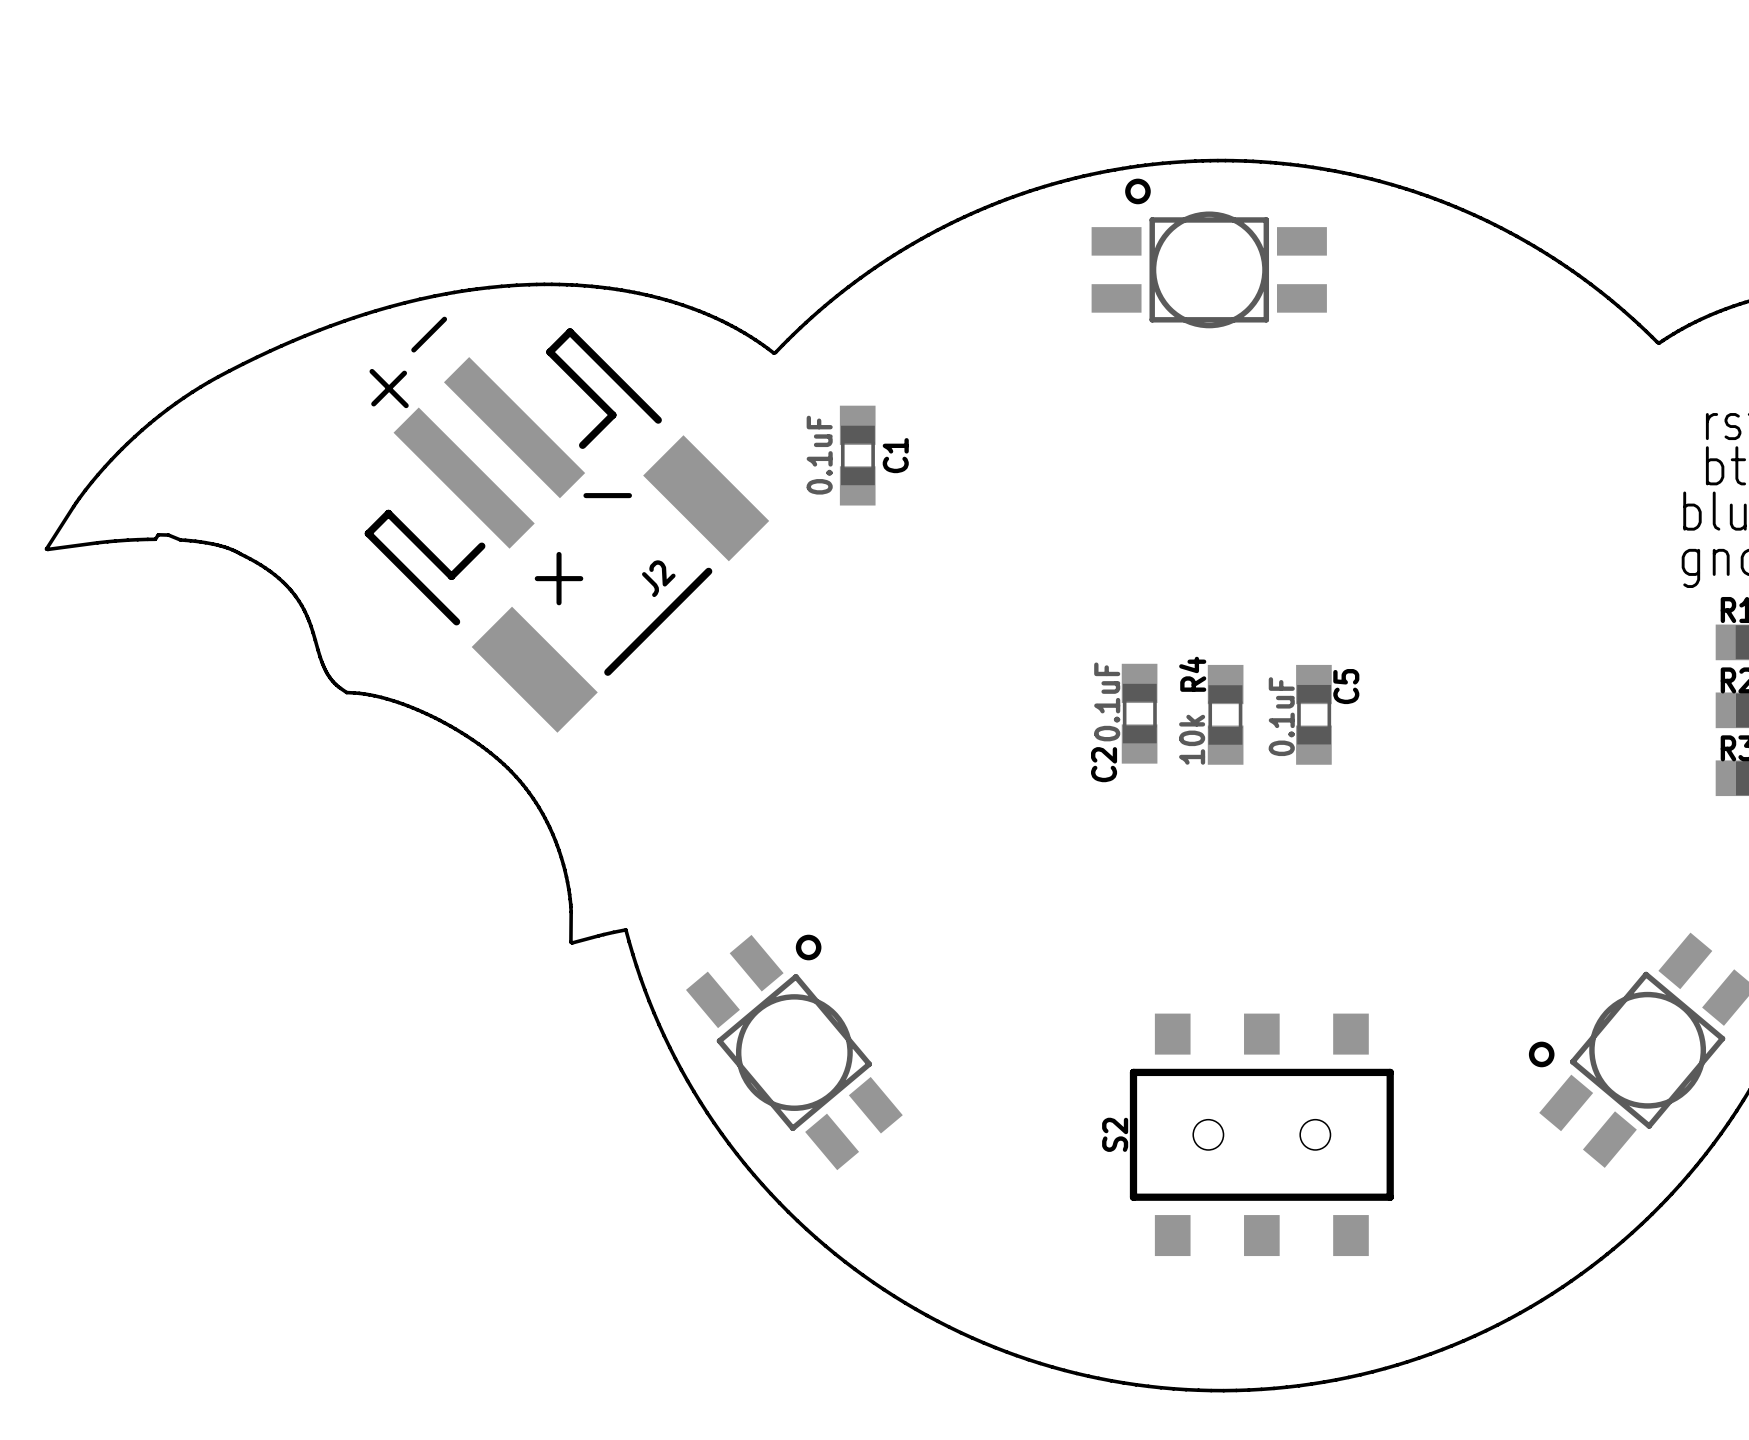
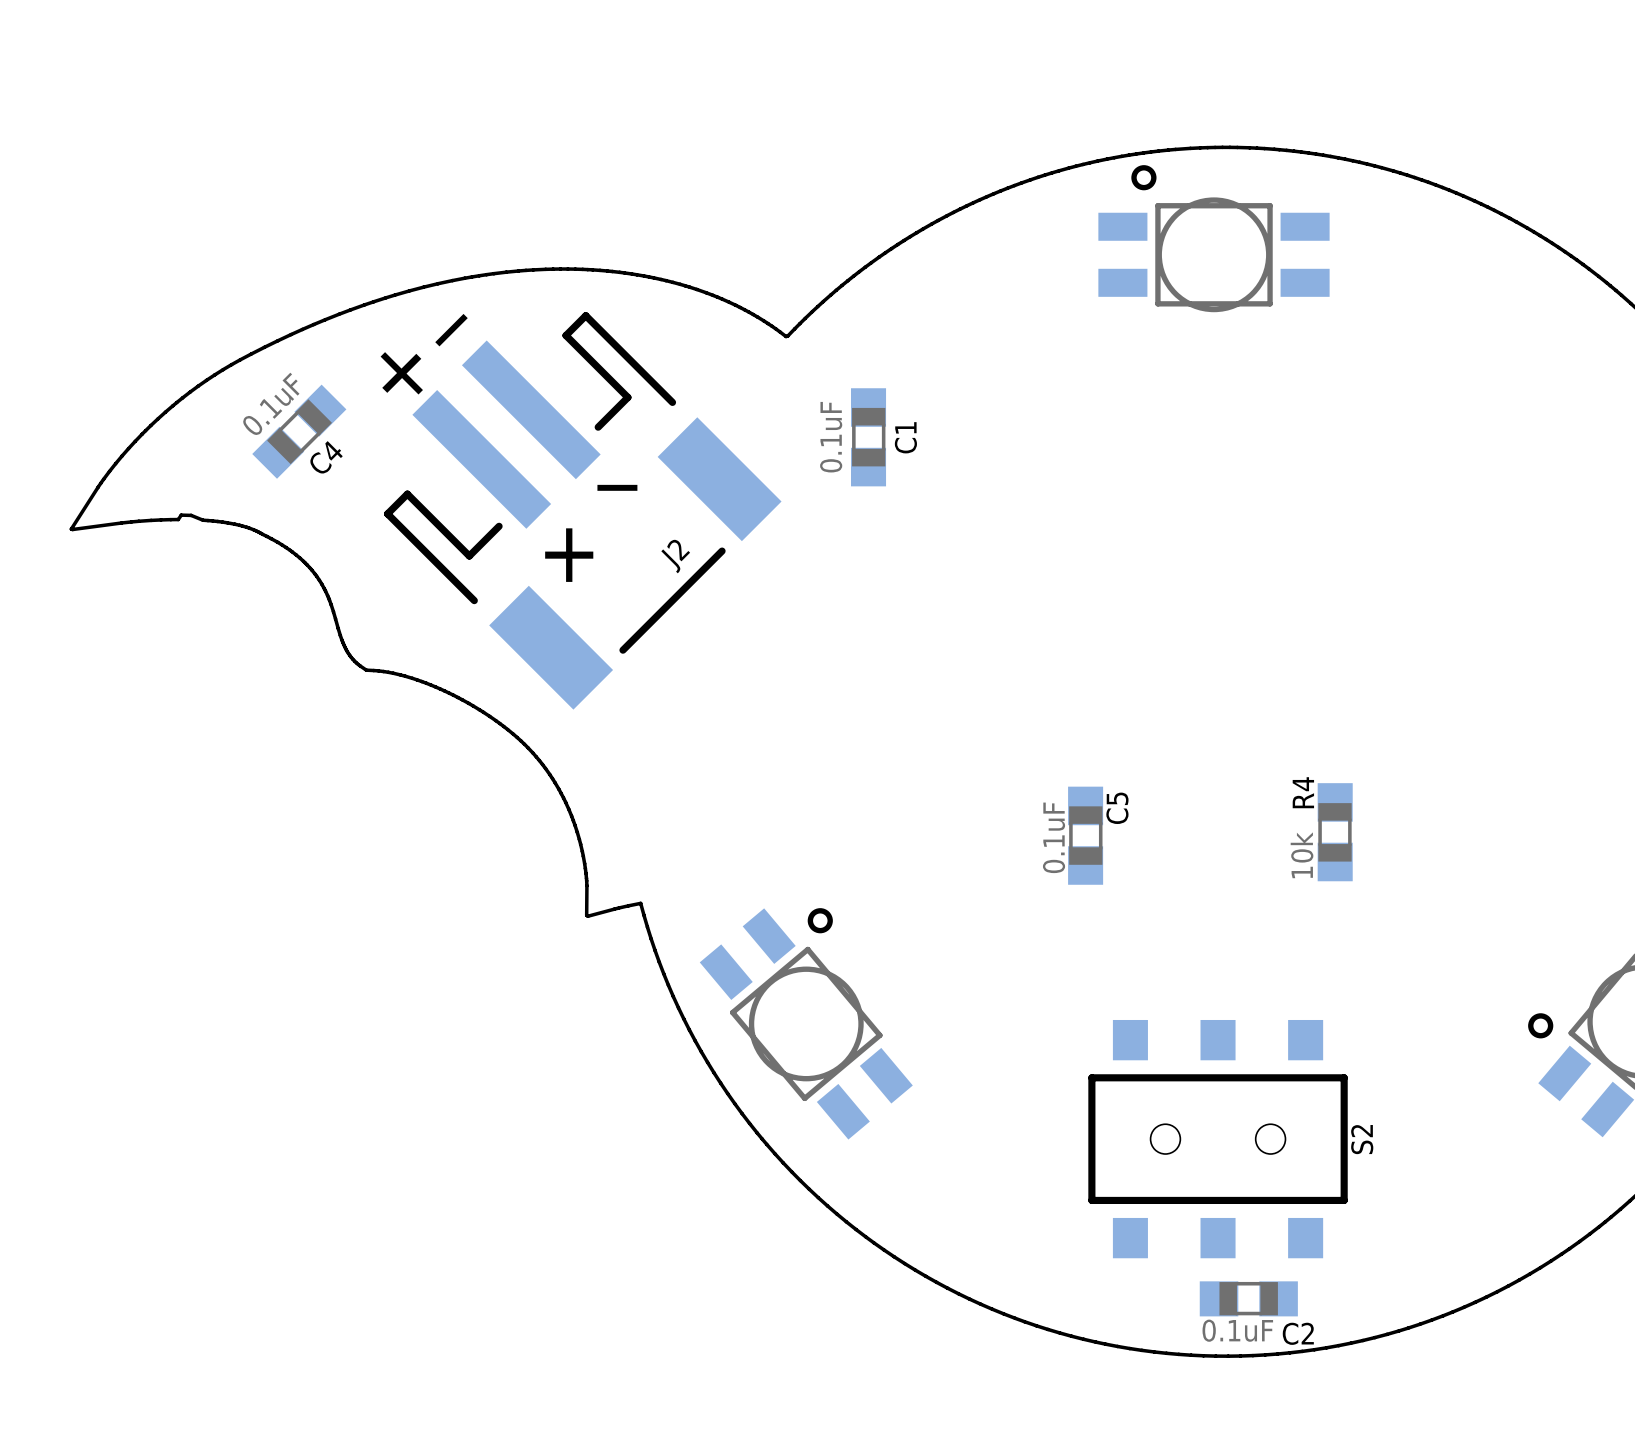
C4: none -> 0.1uF (299, 431)
C2 rotation: 0° (1139, 713) -> 90° clockwise (1248, 1298)
C2 position: (1139, 713) -> (1248, 1298)
R4 position: (1225, 714) -> (1335, 832)
C5 position: (1313, 714) -> (1085, 835)
C2 name position: C2 (1104, 764) -> C2 (1298, 1333)
S2 name position: S2 (1115, 1134) -> S2 (1362, 1139)
S2 position: (1261, 1134) -> (1218, 1139)

